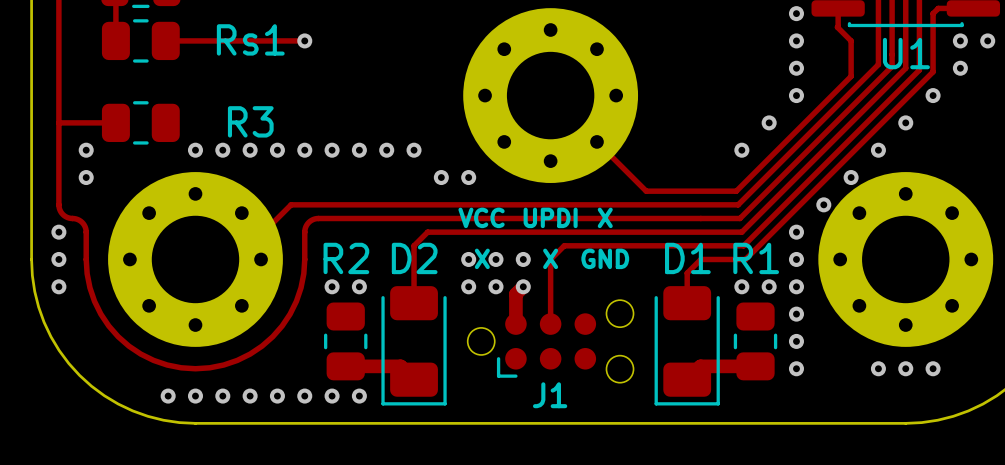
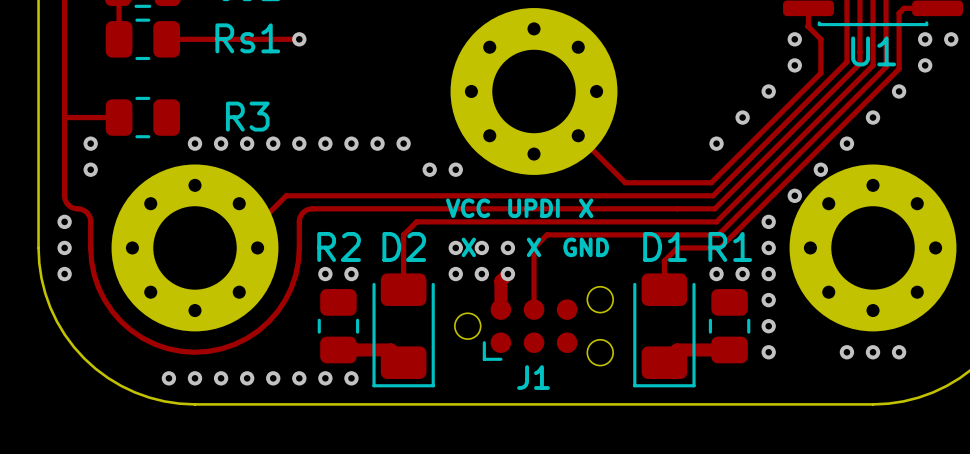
via: (796, 13) -> none
via: (796, 40) -> none
via: none -> (794, 39)
via: (796, 68) -> none
via: none -> (794, 65)

